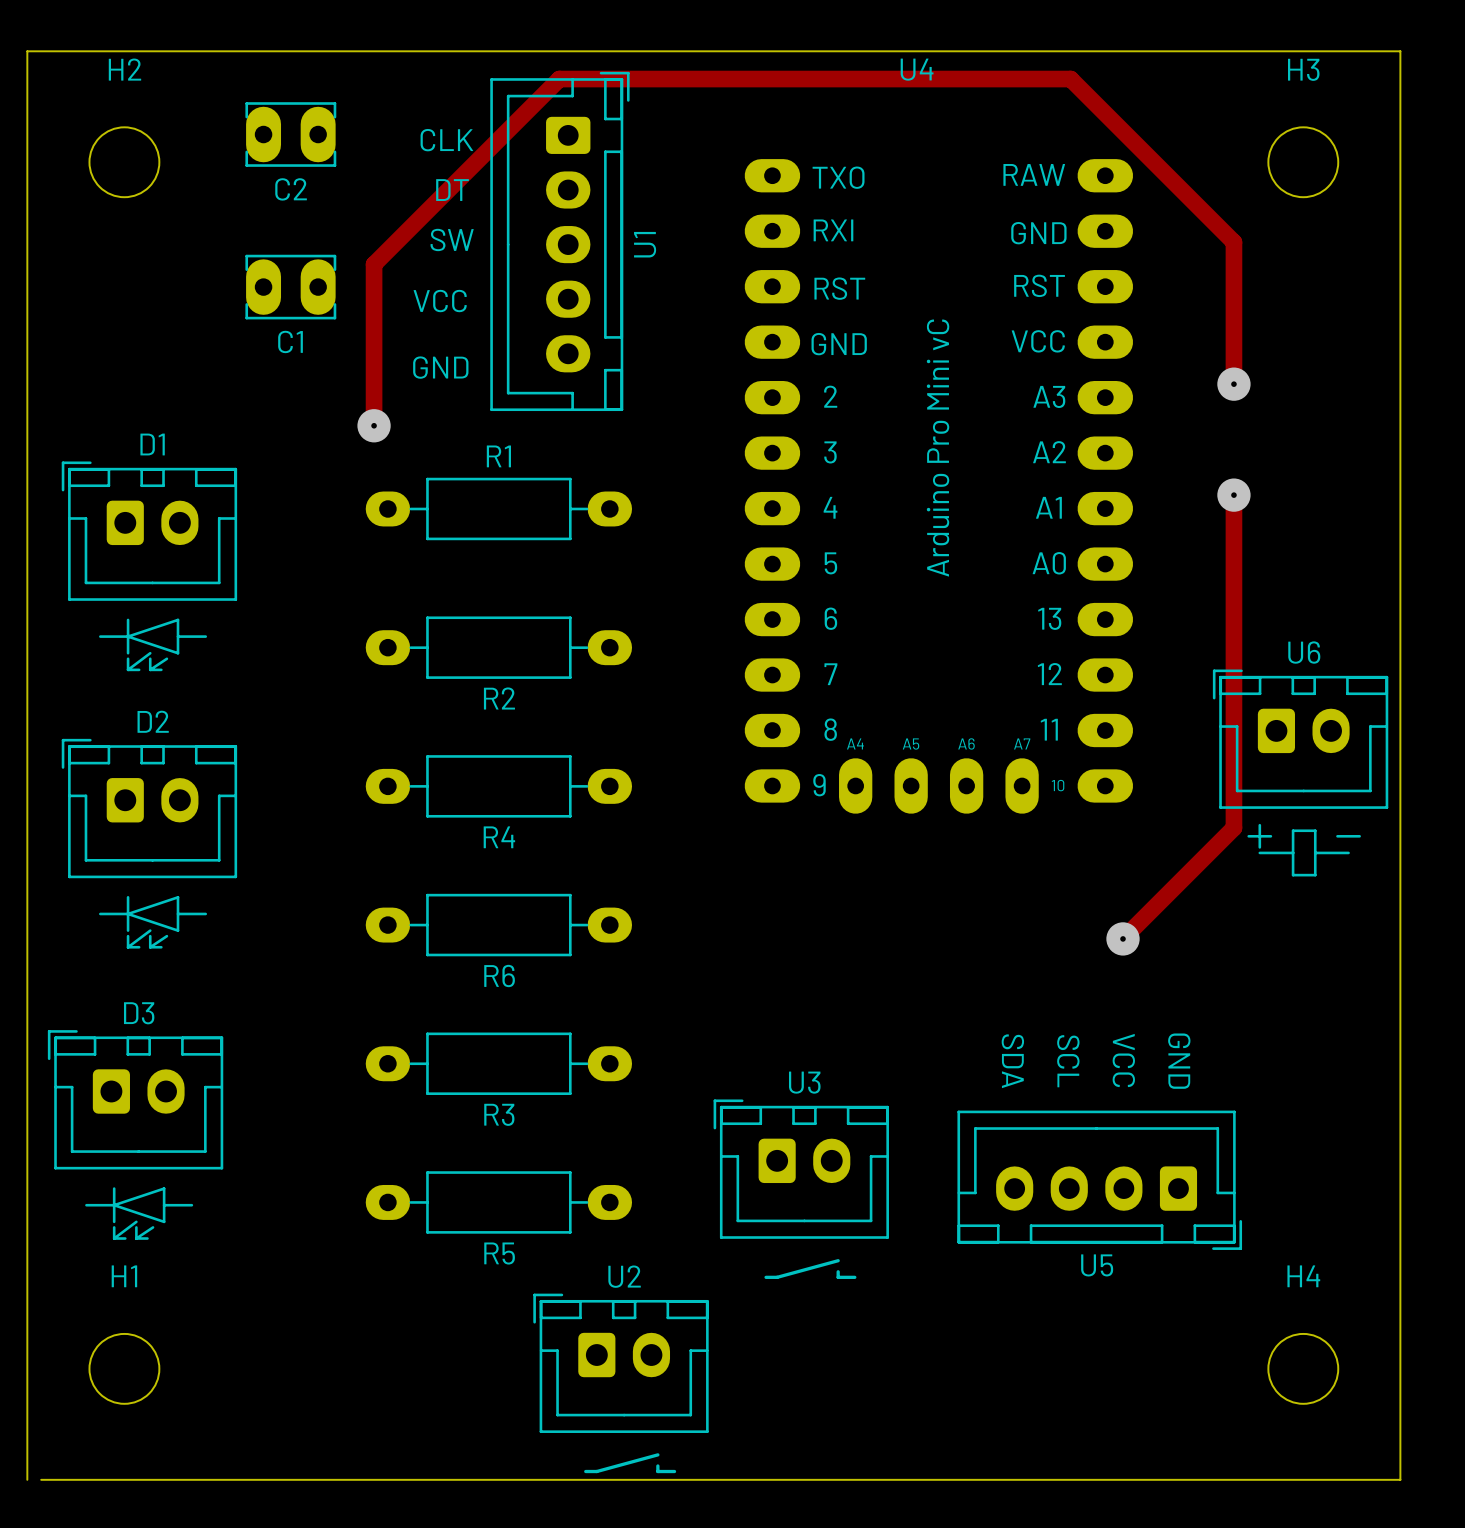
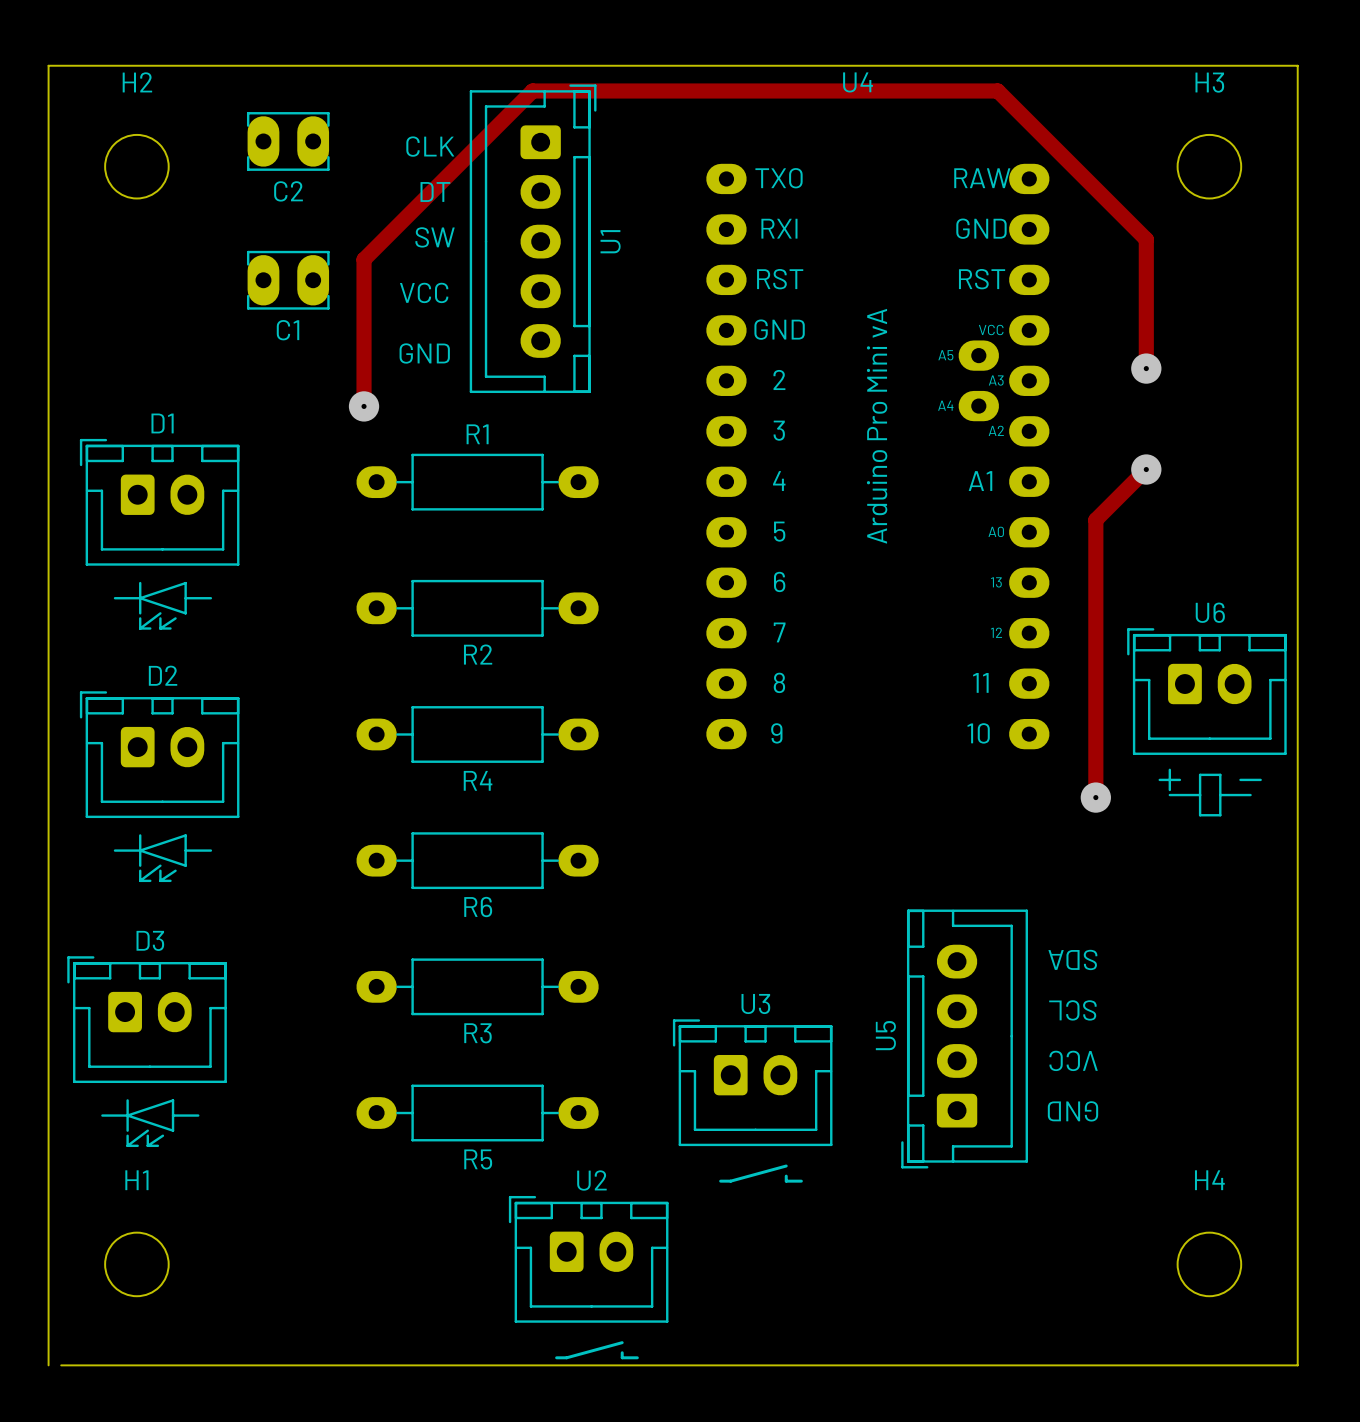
U4 footprint: [744, 159, 1134, 814] -> [706, 163, 1050, 750]
track: (1233, 495) (1233, 827) (1123, 938) -> (1146, 469) (1095, 519) (1095, 797)
via position: (1123, 938) -> (1095, 797)
U5 rotation: 0° (1099, 1180) -> 90° clockwise (964, 1039)

